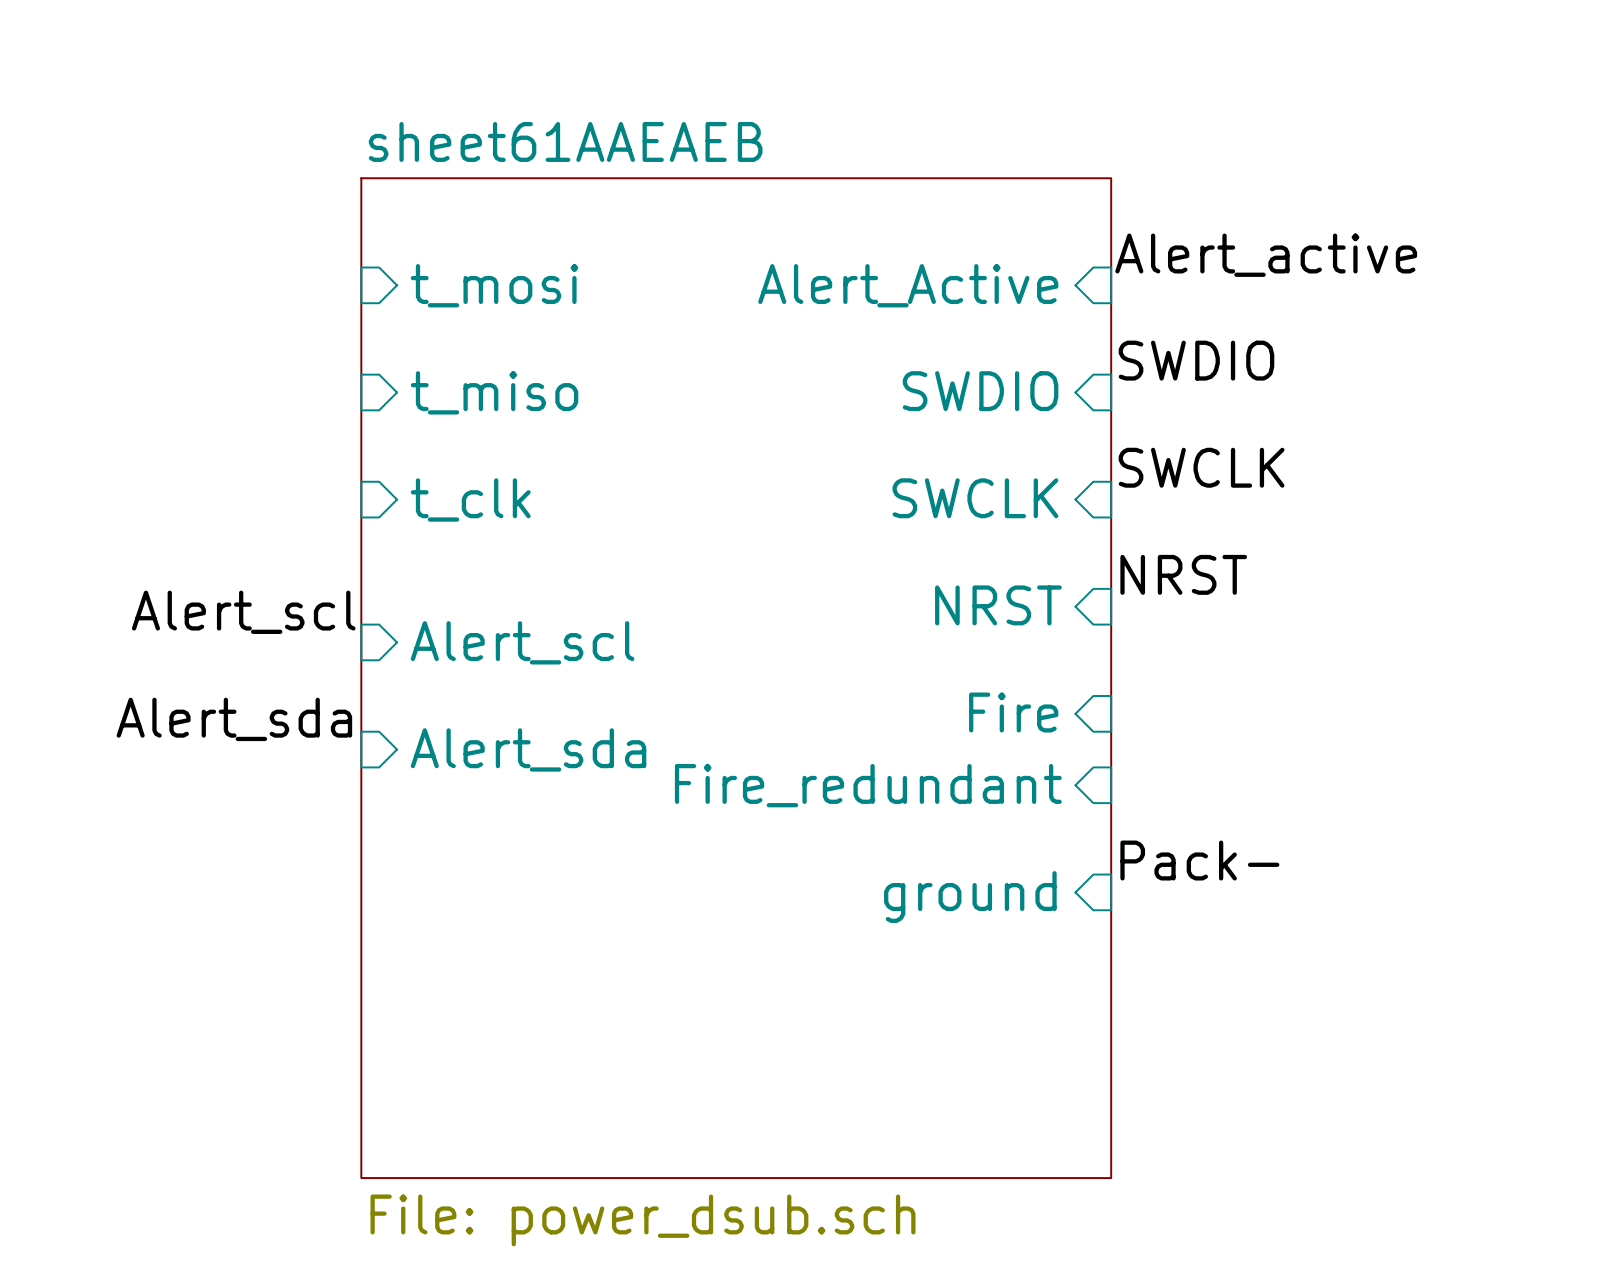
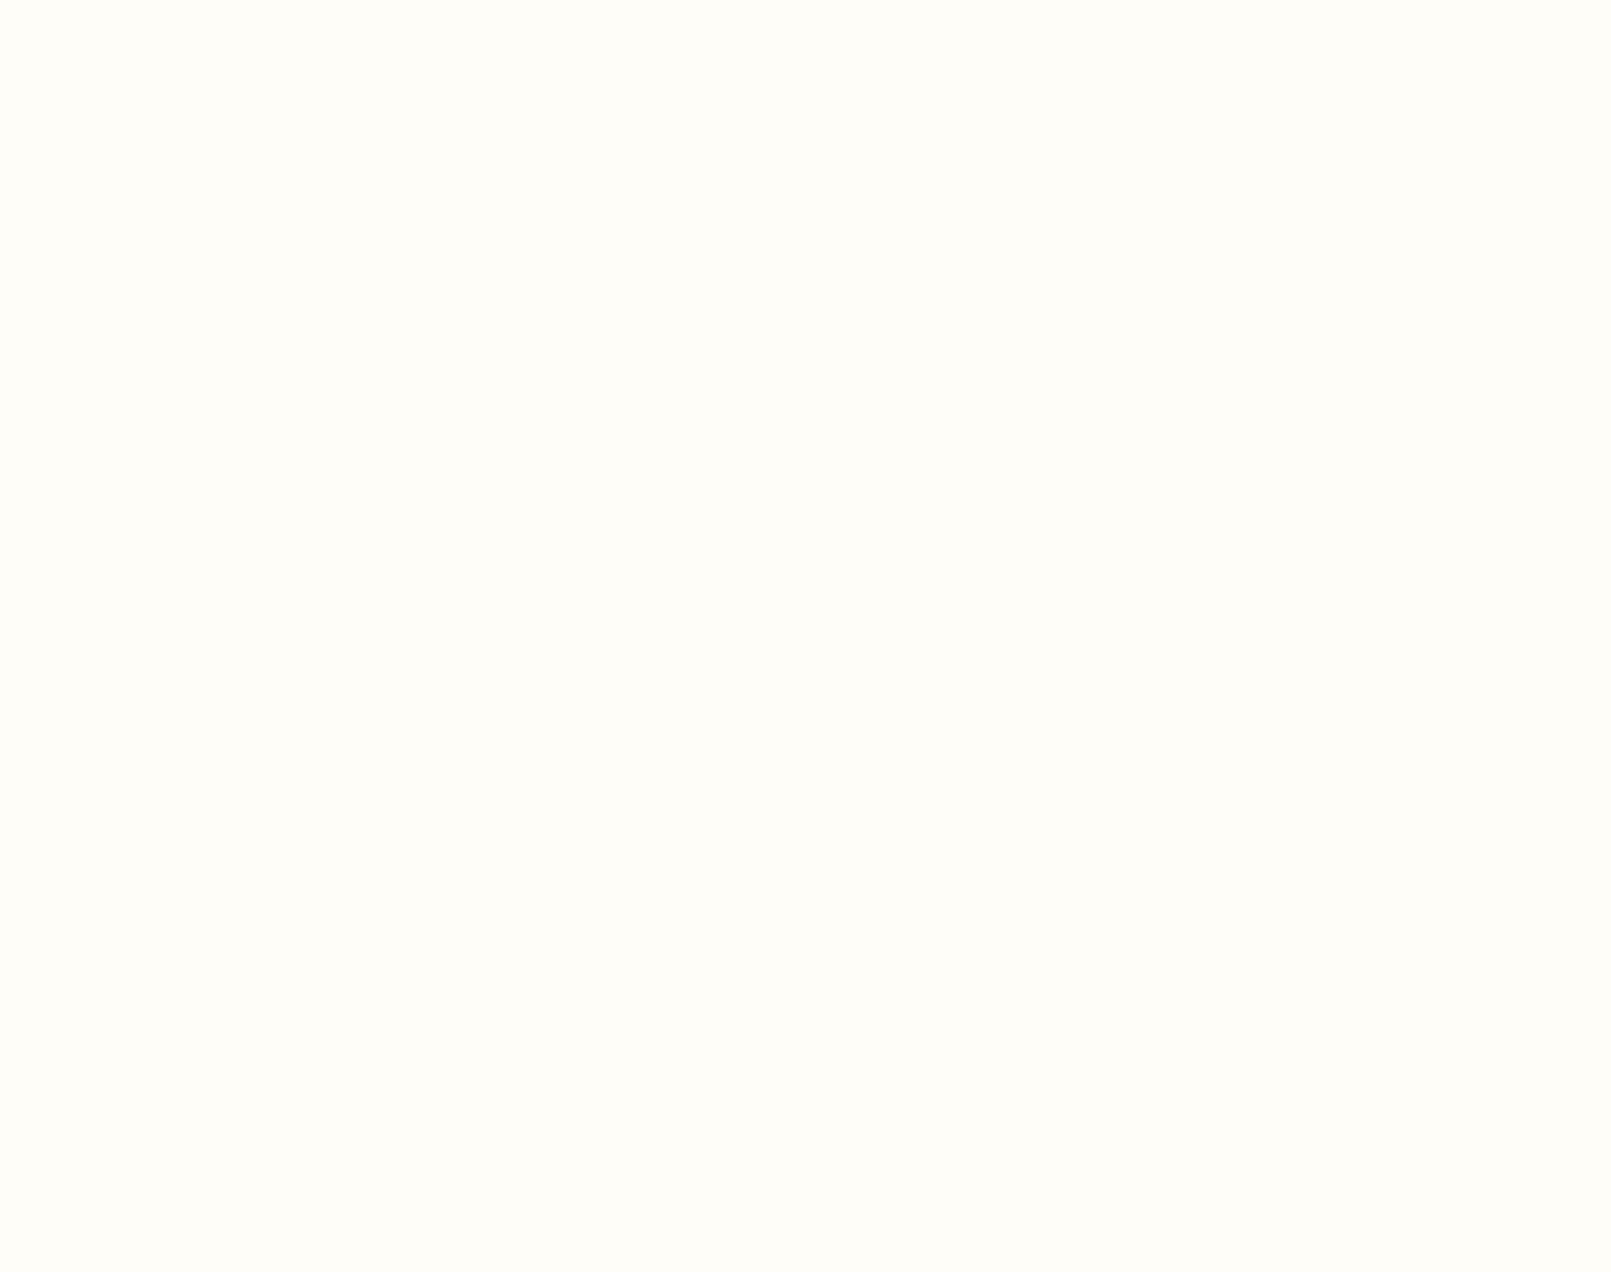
label: Alert_active (1266, 255) -> none
sheet pin: t_mosi (494, 285) -> none
sheet pin: Alert_Active (908, 285) -> none
label: SWDIO (1196, 360) -> none
sheet pin: SWDIO (980, 391) -> none
sheet pin: t_miso (494, 392) -> none
label: SWCLK (1201, 467) -> none
sheet pin: SWCLK (975, 498) -> none
sheet pin: t_clk (470, 499) -> none
label: NRST (1183, 574) -> none
sheet pin: NRST (998, 605) -> none
label: Alert_scl (243, 612) -> none
sheet pin: Alert_scl (522, 642) -> none
sheet sheet61AAEAEB: File: power_dsub.sch (736, 678) -> none
sheet pin: Fire (1013, 712) -> none
label: Alert_sda (234, 719) -> none
sheet pin: Alert_sda (528, 749) -> none
sheet pin: Fire_redundant (868, 785) -> none
label: Pack- (1199, 860) -> none
sheet pin: ground (970, 897) -> none

